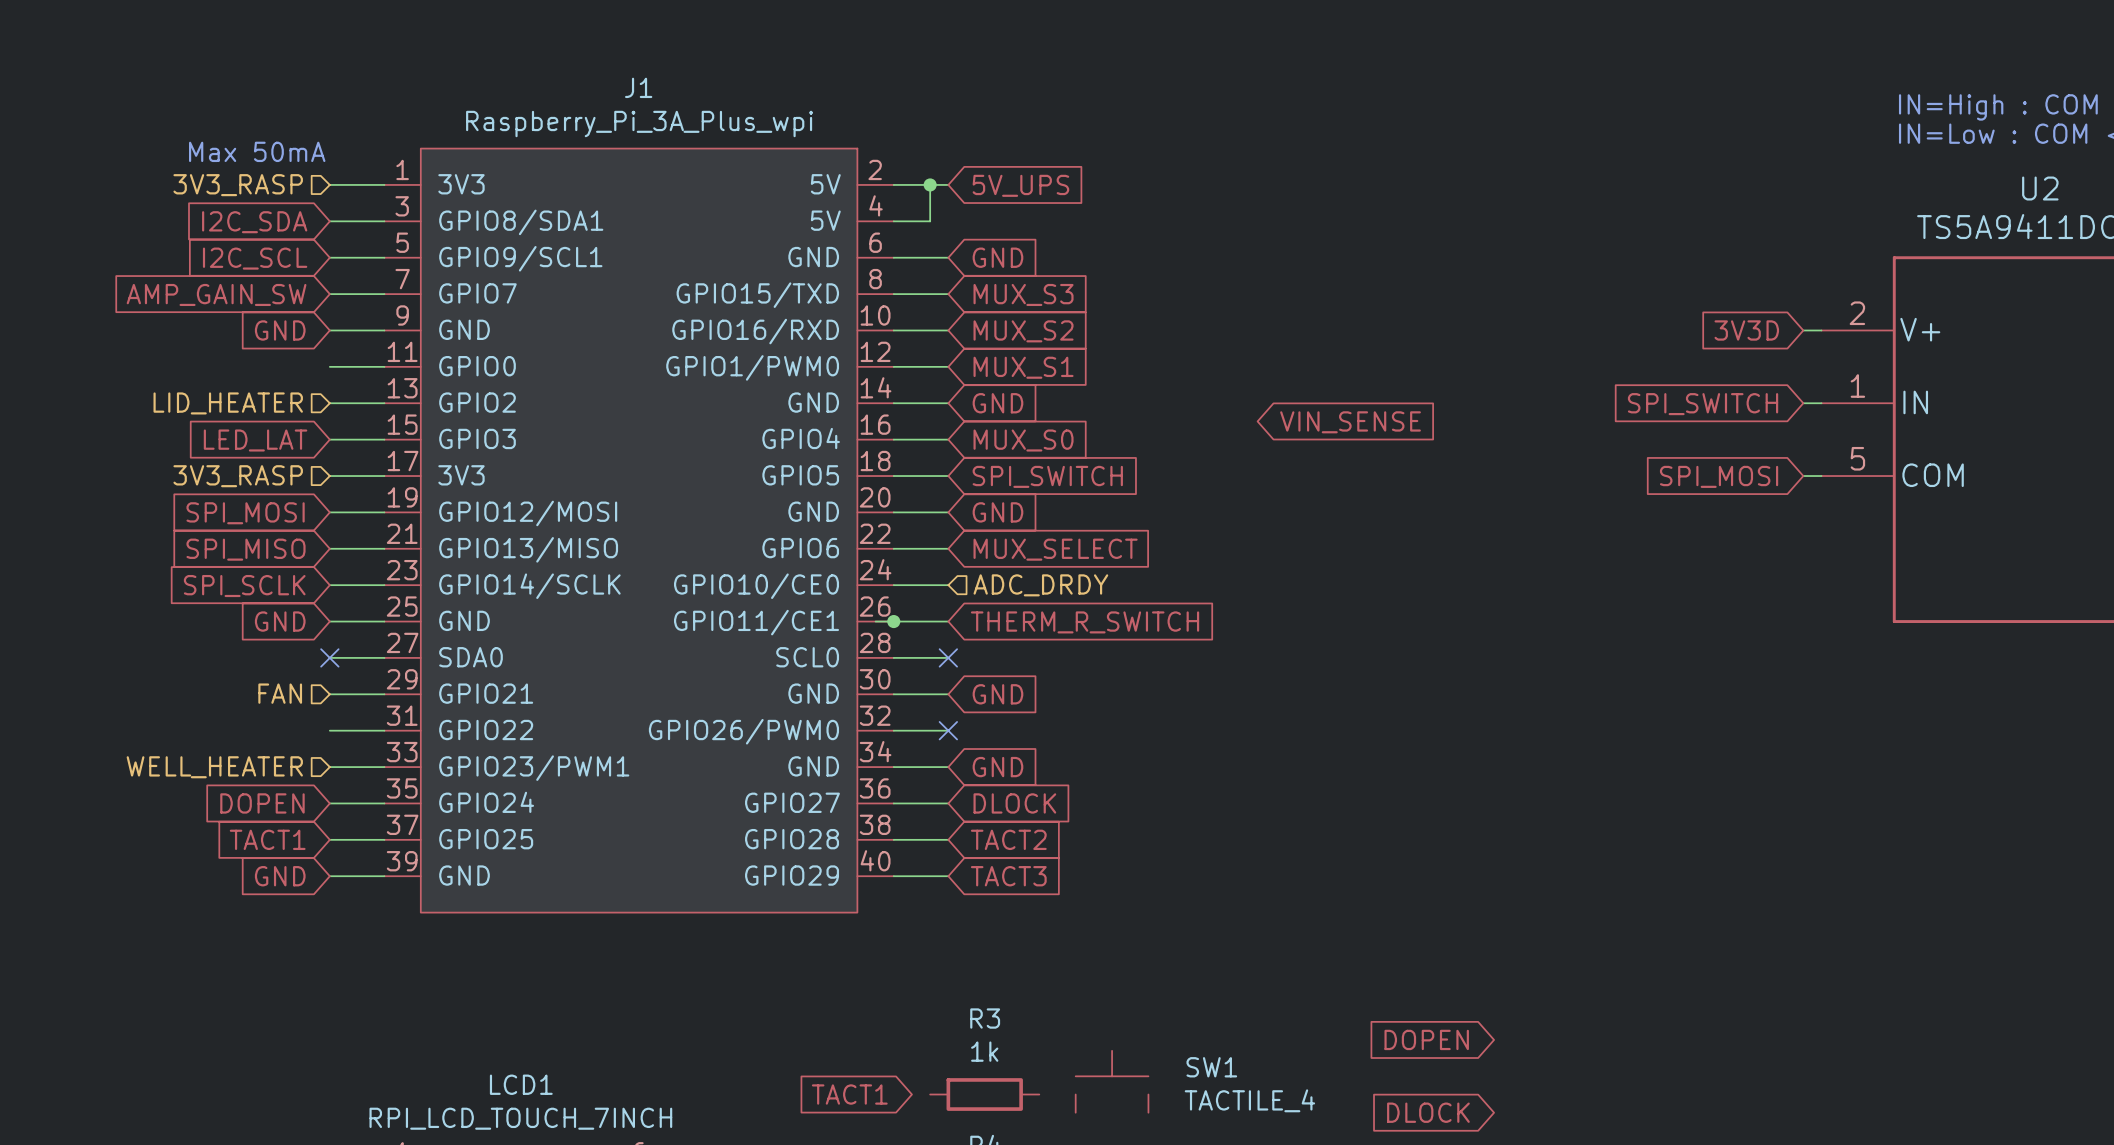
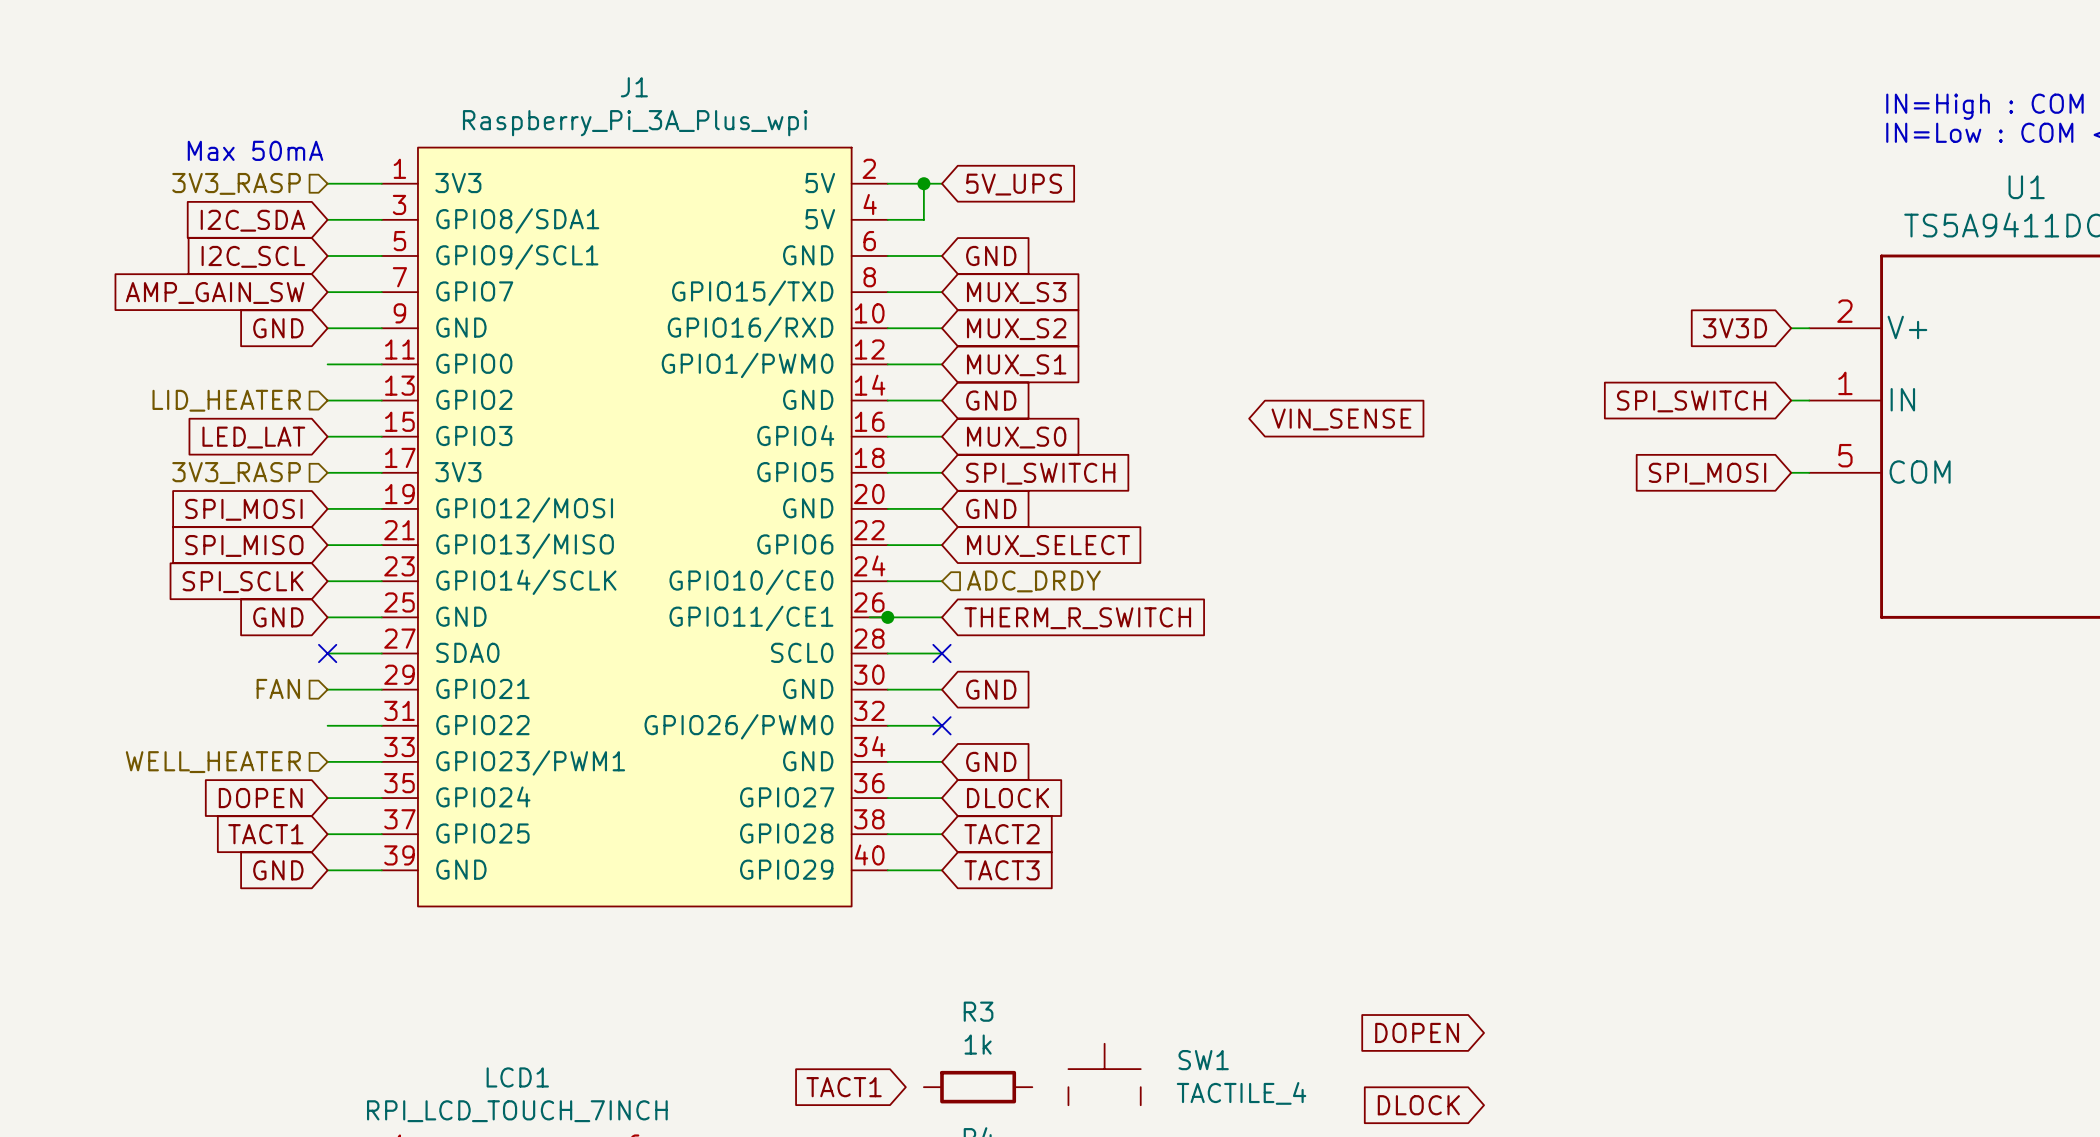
U2 name: U2 (2040, 188) -> U1 (2026, 187)

